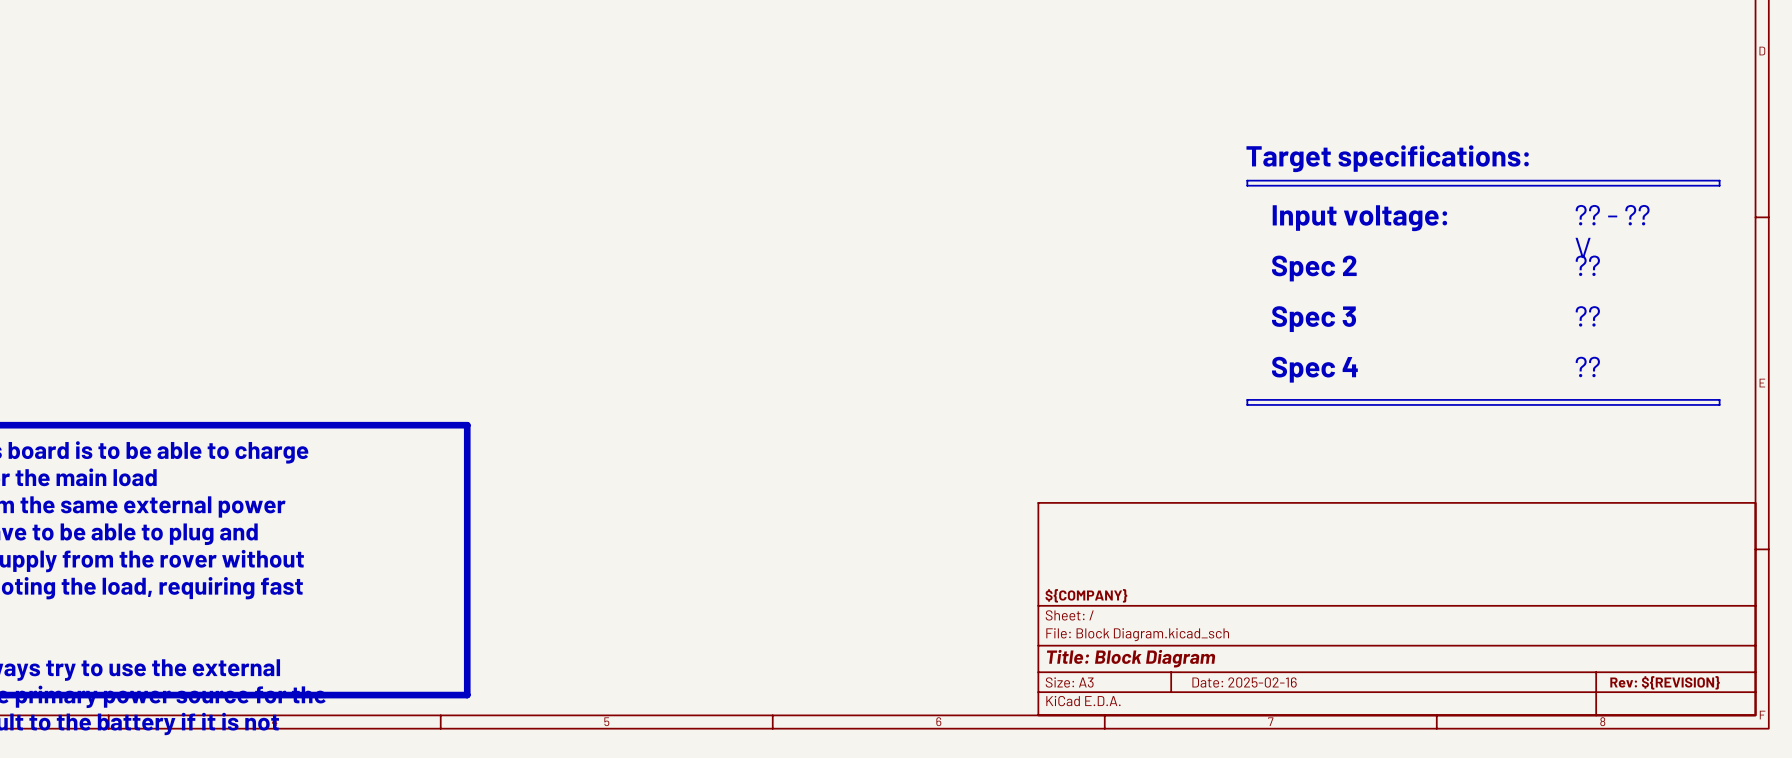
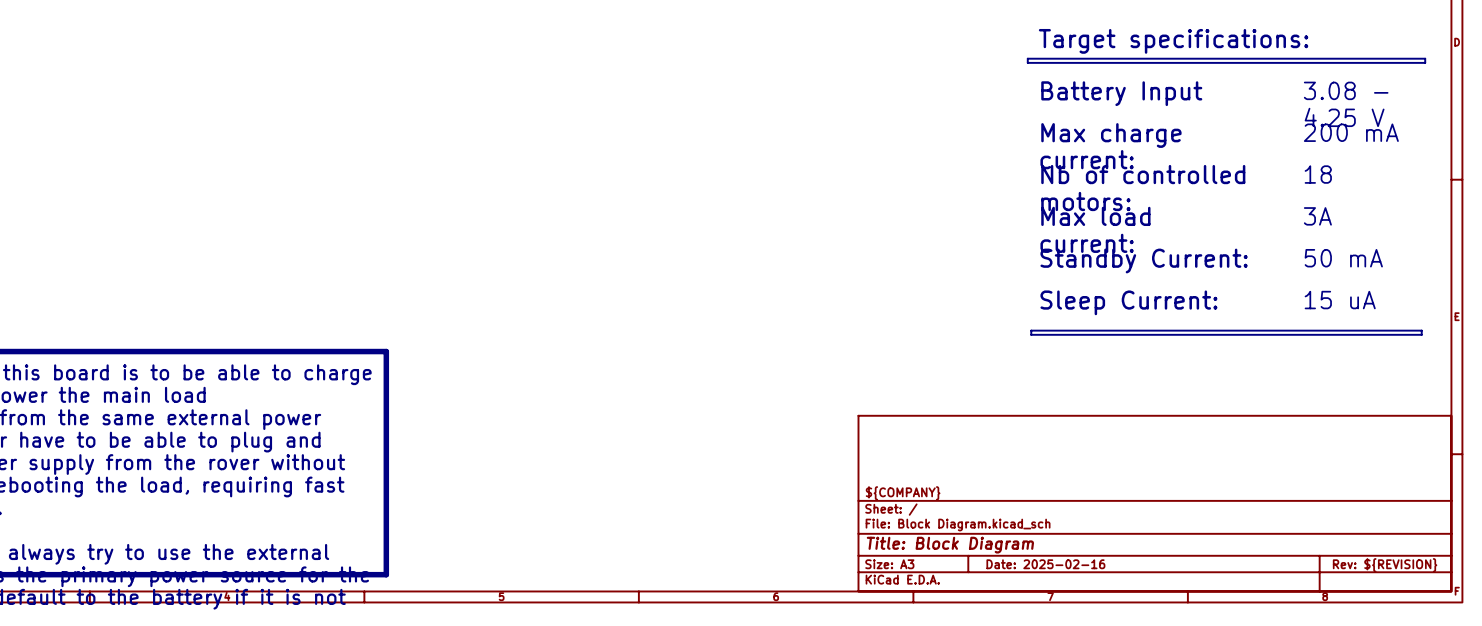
line: none -> (1027, 58) (1425, 58) (1425, 62) (1027, 62) (1027, 58)
text: none -> 3.08 - (1346, 90)
text: none -> Battery Input (1121, 93)
text: none -> 4.25 V (1344, 117)
text position: Target specifications: (1387, 158) -> Target specifications: (1173, 41)
text: none -> 200 mA (1351, 132)
text: none -> Max charge (1111, 135)
line: (1247, 180) (1247, 185) (1719, 185) (1719, 180) (1247, 180) -> none
text: none -> current: (1087, 159)
text: none -> Nb of controlled (1143, 174)
text: ?? - ?? (1612, 215) -> 18 (1318, 174)
text: Input voltage: (1359, 218) -> none
text: none -> motors: (1085, 201)
text: V (1583, 247) -> none
text: none -> Max load (1095, 216)
text: ?? (1587, 265) -> 3A (1317, 216)
text: Spec 2 (1314, 268) -> none
text: none -> current: (1087, 243)
text: none -> Standby Current: (1144, 261)
text: ?? (1587, 316) -> 50 mA (1343, 258)
text: Spec 3 (1314, 319) -> none
text: none -> Sleep Current: (1128, 302)
text: ?? (1587, 366) -> 15 uA (1340, 300)
text: Spec 4 (1314, 369) -> none

